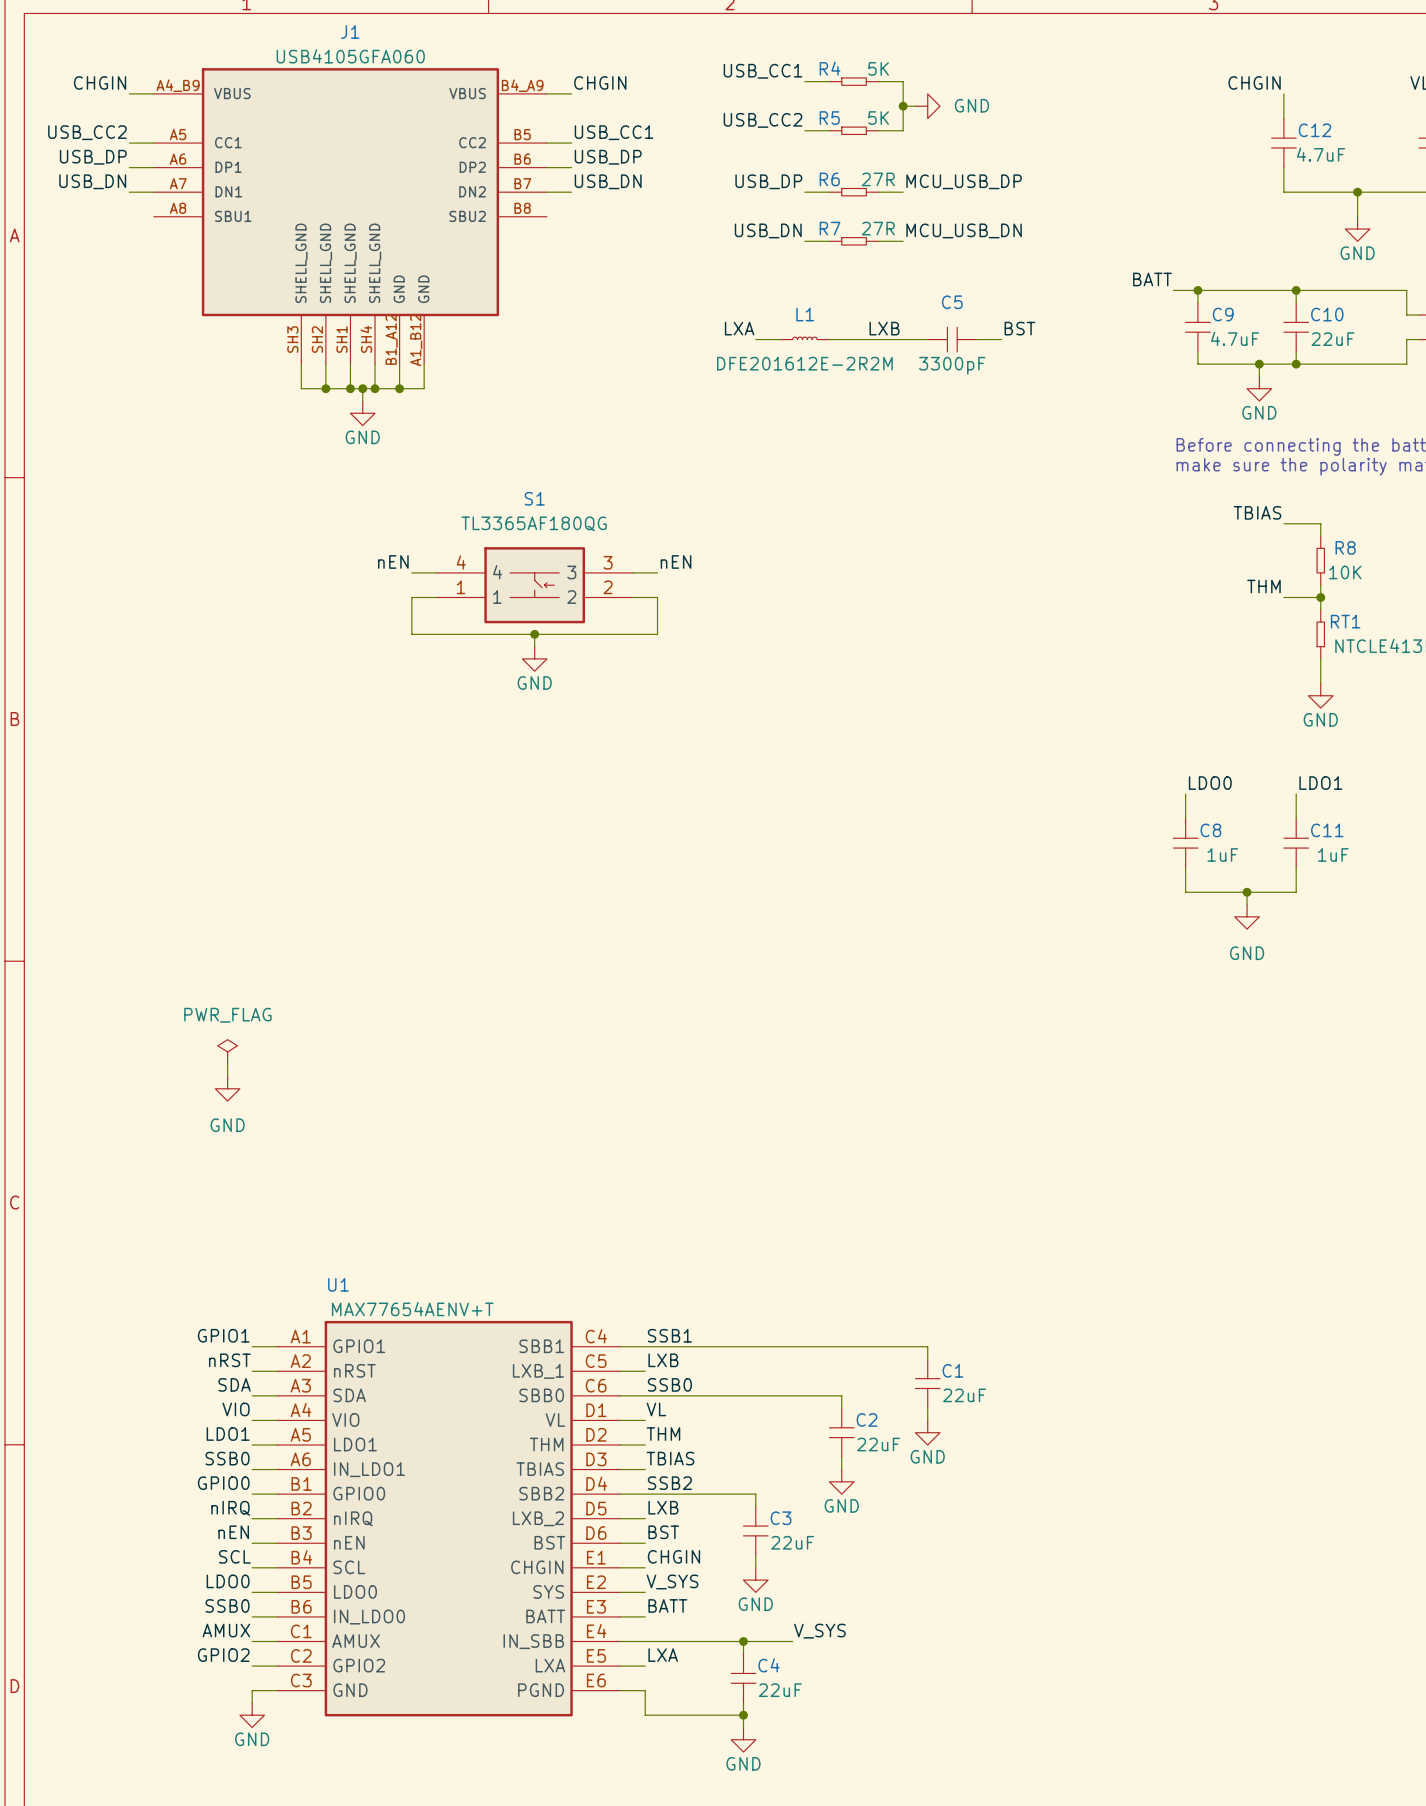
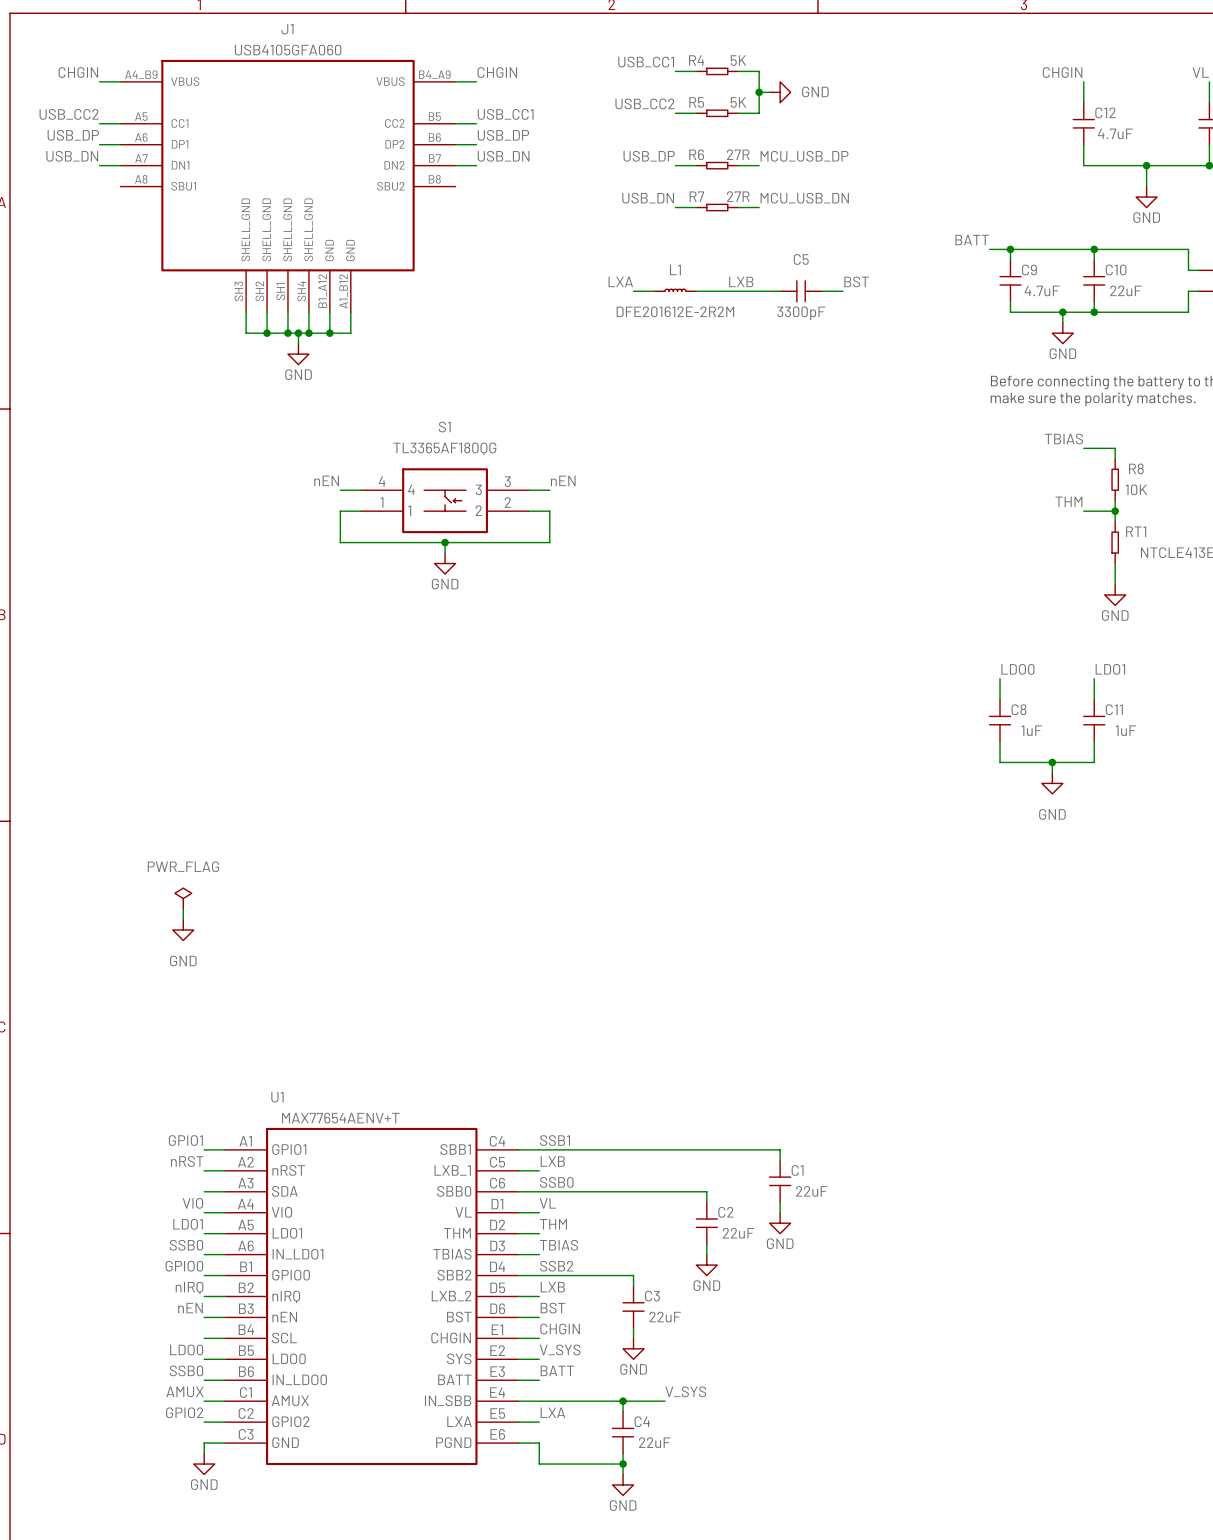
label: SDA (234, 1384) -> none
label: SCL (234, 1556) -> none

